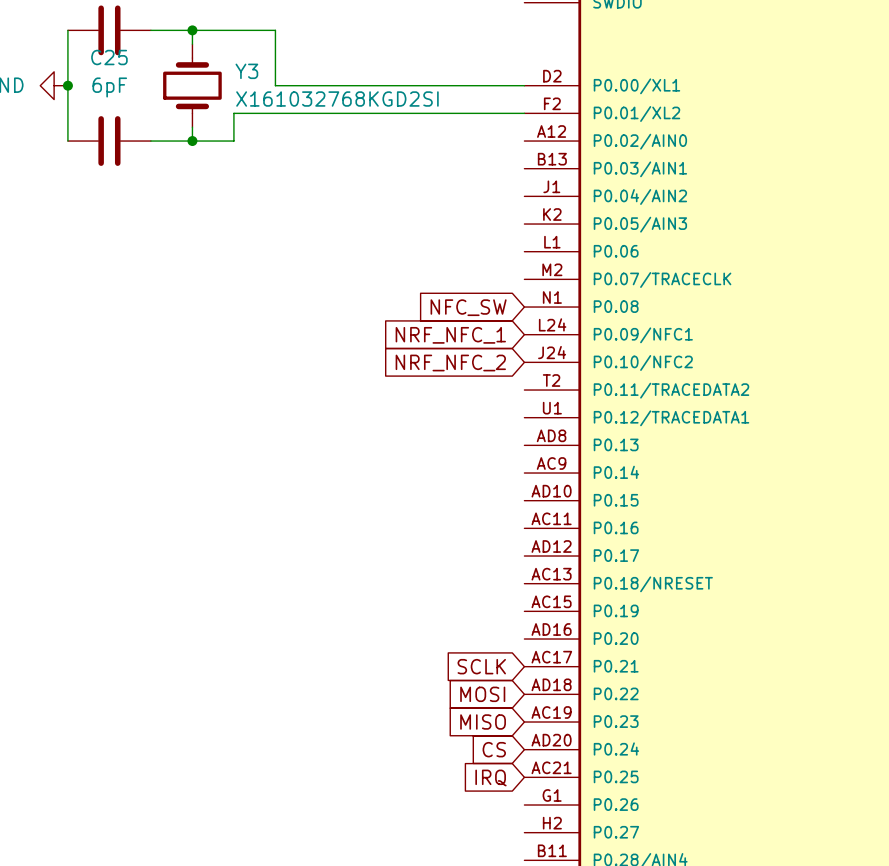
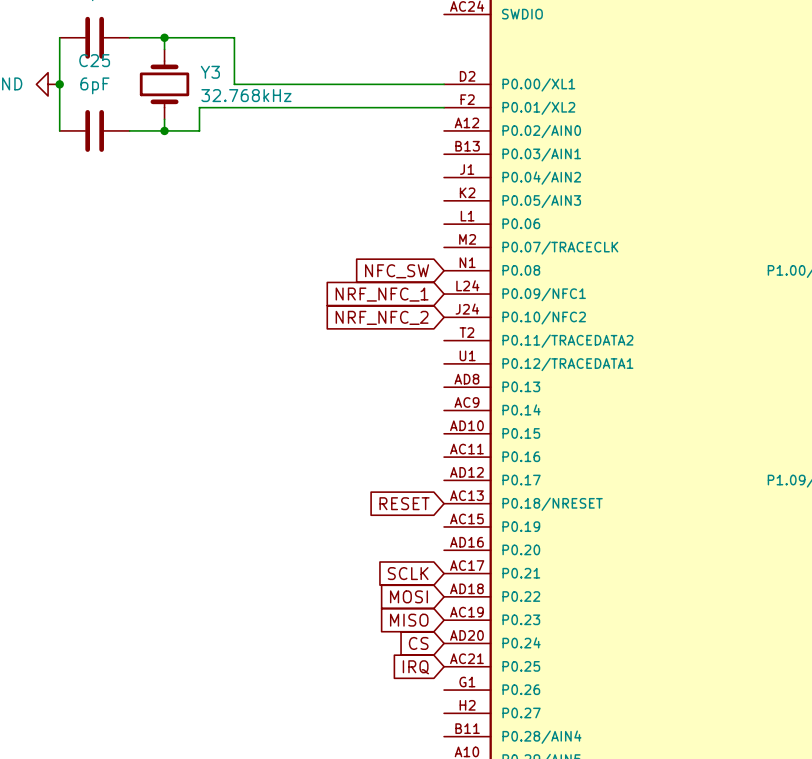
Y3 value: X161032768KGD2SI (337, 99) -> 32.768kHz (246, 95)
global label: none -> RESET (404, 503)

